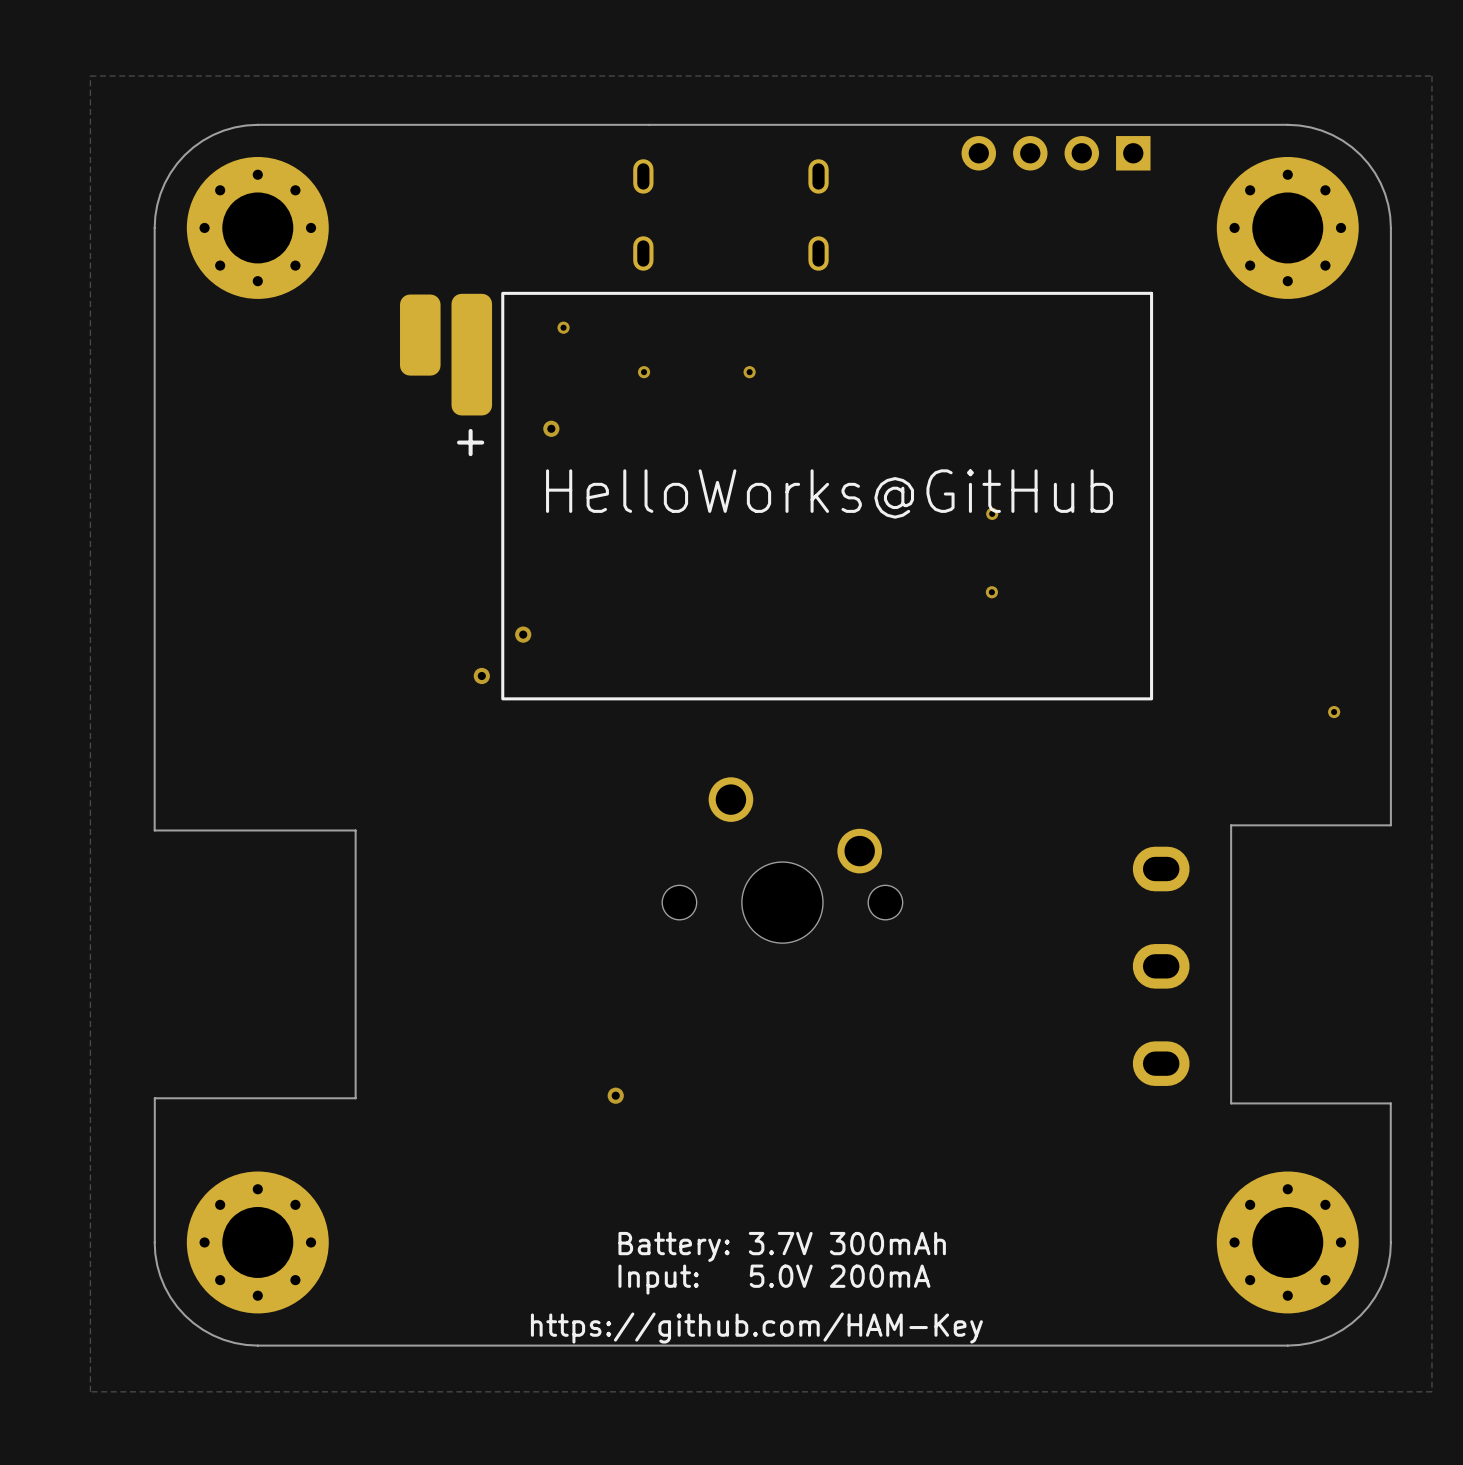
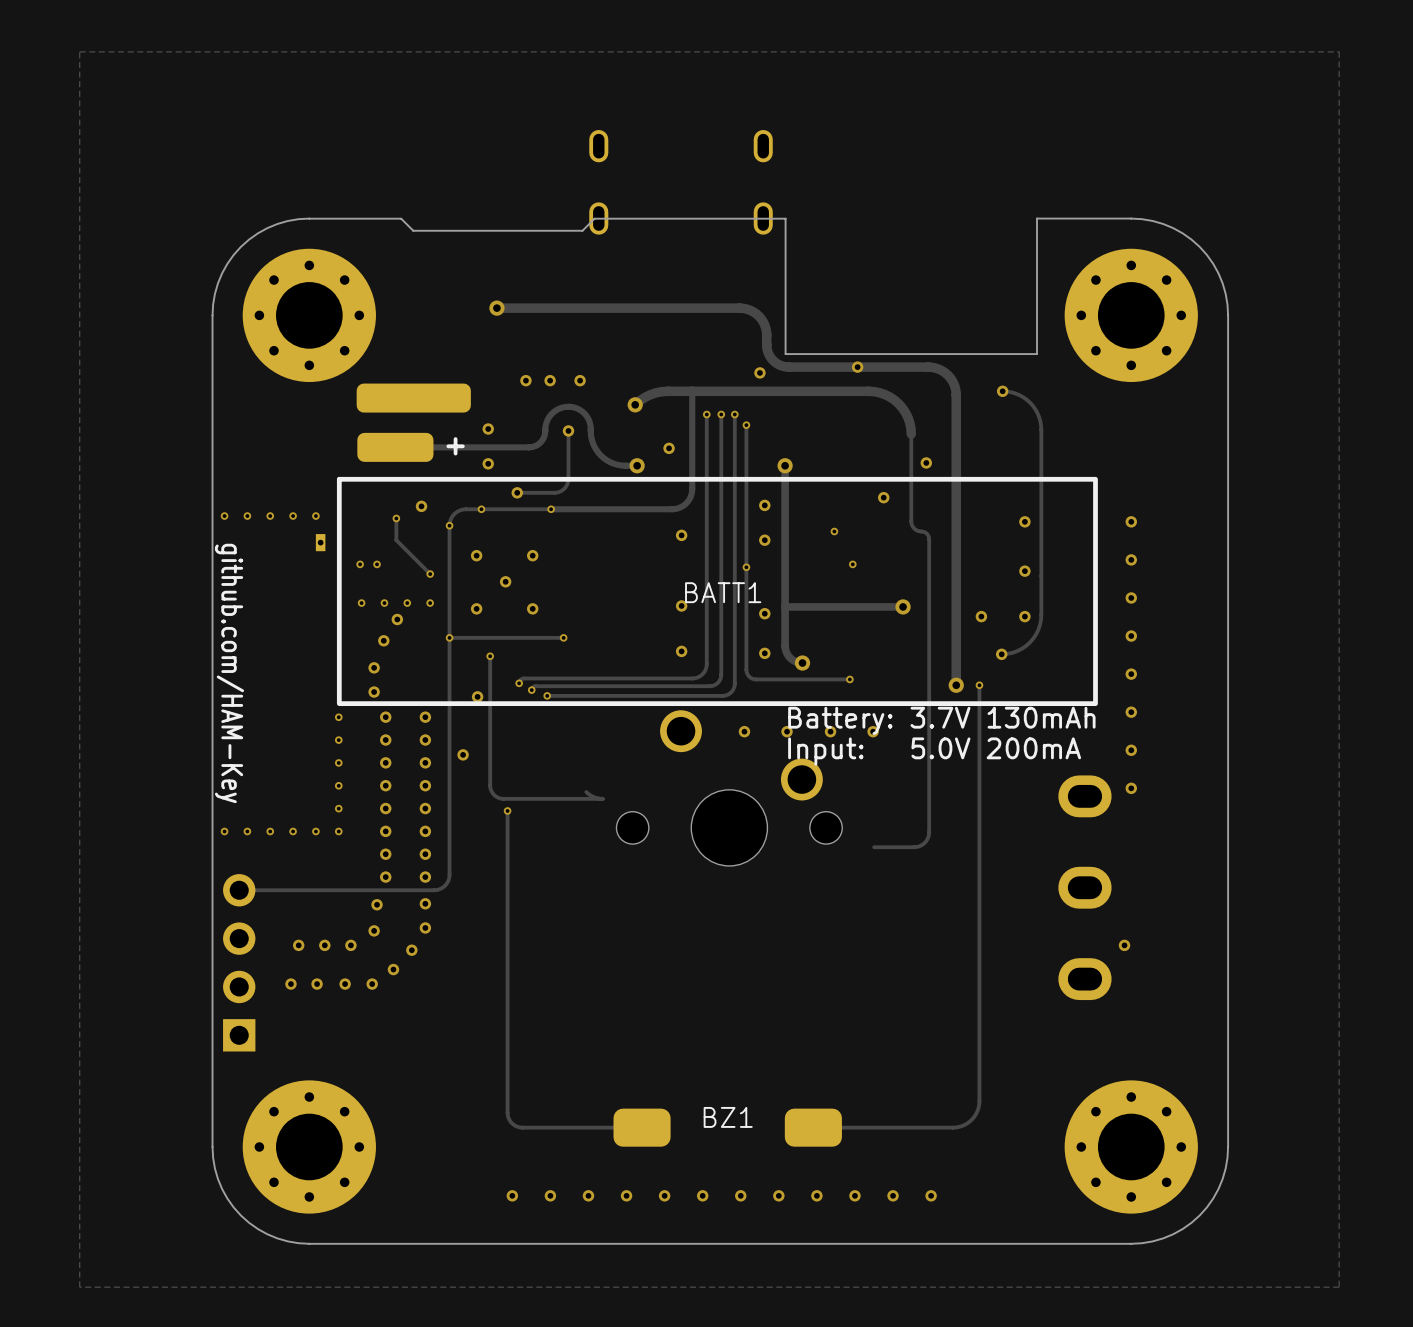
part: (1056, 153) -> none
part position: (257, 227) -> (309, 315)
part position: (1287, 227) -> (1131, 315)
via: (563, 327) -> none
track: none -> (496, 308) (742, 308) (754, 312) (762, 320) (766, 329) (768, 354) (773, 360) (781, 365) (928, 367) (937, 368) (945, 373) (953, 382) (956, 395) (956, 685)
via: none -> (496, 308)
via: (644, 372) -> none
via: (749, 372) -> none
via: none -> (857, 367)
via: none -> (759, 372)
via: none -> (525, 380)
via: none -> (550, 380)
via: none -> (580, 380)
via: (551, 428) -> none
track: none -> (692, 391) (692, 491) (690, 497) (684, 504) (671, 509) (551, 509)
track: none -> (1002, 391) (1015, 393) (1026, 399) (1035, 409) (1040, 421) (1041, 614) (1038, 629) (1029, 642) (1016, 651) (1001, 654)
via: none -> (1002, 391)
track: none -> (635, 404) (650, 394) (667, 391) (868, 391) (889, 397) (905, 412) (911, 434) (911, 523) (916, 529) (926, 533) (929, 539) (929, 834) (924, 842) (918, 846) (874, 847)
via: none -> (635, 404)
track: none -> (706, 414) (706, 664) (703, 672) (692, 678) (524, 678) (519, 683)
via: none -> (706, 414)
track: none -> (721, 414) (721, 674) (718, 681) (709, 686) (535, 686) (531, 690)
via: none -> (721, 414)
track: none -> (734, 414) (734, 683) (733, 689) (728, 694) (722, 695) (547, 695)
via: none -> (734, 414)
track: none -> (746, 425) (747, 673) (750, 677) (756, 679) (849, 679)
via: none -> (746, 425)
via: none -> (488, 429)
track: none -> (568, 430) (568, 478) (565, 487) (555, 492) (517, 492)
via: none -> (568, 430)
text: HelloWorks@GitHub (829, 494) -> none
part: (776, 496) -> none
track: none -> (395, 447) (533, 446) (543, 439) (546, 422) (552, 413) (560, 408) (570, 406) (580, 410) (587, 417) (592, 442) (603, 458) (617, 464) (637, 465)
via: none -> (669, 448)
via: none -> (488, 463)
via: none -> (637, 465)
track: none -> (785, 465) (785, 647) (791, 659) (802, 663)
via: none -> (785, 465)
via: none -> (517, 492)
via: none -> (883, 497)
via: none -> (764, 505)
via: none -> (421, 506)
via: none -> (481, 509)
track: none -> (551, 509) (463, 509) (455, 512) (450, 521) (449, 874) (446, 884) (440, 888) (434, 890) (239, 890)
via: none -> (551, 509)
via: none -> (224, 516)
via: none -> (247, 516)
via: none -> (270, 516)
via: none -> (293, 516)
via: none -> (315, 516)
track: none -> (396, 518) (396, 540) (430, 574)
via: none -> (396, 518)
via: none -> (1024, 521)
via: none -> (1131, 521)
via: none -> (449, 525)
via: none -> (834, 531)
via: none -> (681, 535)
via: (991, 592) -> none
via: none -> (764, 540)
part: none -> (320, 542)
BATT1: none -> (717, 544)
via: none -> (476, 555)
via: none -> (532, 555)
via: none -> (1131, 559)
via: none -> (360, 564)
via: none -> (377, 564)
via: none -> (852, 564)
via: none -> (746, 567)
via: none -> (1024, 571)
via: none -> (430, 574)
via: (523, 634) -> none
via: none -> (505, 581)
via: none -> (1131, 597)
via: none -> (361, 603)
via: none -> (384, 603)
via: none -> (407, 603)
via: none -> (430, 603)
via: none -> (681, 605)
track: none -> (903, 606) (785, 606)
via: none -> (903, 606)
via: none -> (476, 608)
via: none -> (532, 608)
via: none -> (764, 613)
via: (481, 675) -> none
via: none -> (981, 616)
via: none -> (1024, 616)
via: none -> (397, 619)
via: none -> (1131, 636)
via: none -> (449, 637)
track: none -> (563, 637) (449, 637)
via: none -> (563, 637)
via: none -> (383, 640)
via: (1334, 712) -> none
via: none -> (681, 651)
via: none -> (764, 653)
via: none -> (1001, 654)
track: none -> (490, 656) (490, 785) (492, 792) (502, 798) (602, 798) (593, 797) (586, 792)
via: none -> (490, 656)
via: none -> (802, 663)
via: none -> (374, 667)
text: none -> github.com/HAM-Key (229, 673)
via: none -> (1131, 674)
via: none -> (849, 679)
via: none -> (519, 683)
via: none -> (956, 685)
track: none -> (979, 685) (977, 1109) (969, 1121) (955, 1127) (813, 1127)
via: none -> (979, 685)
via: none -> (531, 690)
via: none -> (374, 692)
via: none -> (547, 695)
via: none -> (477, 696)
via: none -> (1131, 712)
via: none -> (338, 717)
via: none -> (385, 717)
via: none -> (425, 717)
text: none -> Battery: 3.7V 130mAh (941, 720)
via: none -> (744, 731)
via: none -> (787, 731)
via: none -> (830, 731)
via: none -> (873, 731)
via: none -> (385, 740)
via: none -> (425, 740)
via: none -> (338, 740)
via: none -> (1131, 750)
text: none -> Input: 5.0V 200mA (934, 751)
via: none -> (463, 754)
board edge: (1390, 825) (1390, 216) (1385, 193) (1375, 173) (1360, 155) (1342, 140) (1321, 130) (1287, 124) (257, 124) (234, 127) (213, 135) (193, 147) (177, 163) (164, 183) (155, 216) (154, 830) (355, 830) (355, 1098) (154, 1098) (155, 1254) (164, 1287) (177, 1306) (193, 1323) (213, 1335) (246, 1344) (335, 1345) -> (309, 218) (287, 220) (267, 228) (240, 246) (227, 263) (217, 283) (212, 315) (213, 1157) (222, 1189) (240, 1215) (267, 1234) (287, 1241) (309, 1243)
board edge: (1390, 825) (1231, 825) (1231, 1103) (1390, 1103) (1390, 1242) -> none
via: none -> (338, 762)
via: none -> (385, 762)
via: none -> (425, 762)
via: none -> (338, 785)
via: none -> (385, 785)
via: none -> (425, 785)
via: none -> (1131, 788)
via: none -> (385, 808)
via: none -> (425, 808)
via: none -> (338, 808)
track: none -> (507, 810) (509, 1119) (514, 1125) (520, 1127) (642, 1127)
via: none -> (507, 810)
via: none -> (224, 831)
via: none -> (247, 831)
via: none -> (270, 831)
via: none -> (293, 831)
via: none -> (315, 831)
via: none -> (338, 831)
via: none -> (385, 831)
via: none -> (425, 831)
via: none -> (385, 854)
via: none -> (425, 854)
via: none -> (385, 877)
via: none -> (425, 877)
via: none -> (425, 903)
via: none -> (377, 904)
via: none -> (425, 927)
via: none -> (374, 930)
via: none -> (298, 945)
via: none -> (324, 945)
via: none -> (350, 945)
via: none -> (1124, 945)
via: none -> (411, 950)
part: none -> (239, 962)
via: none -> (393, 969)
via: none -> (290, 984)
via: none -> (317, 984)
via: none -> (345, 984)
via: none -> (372, 984)
via: (615, 1095) -> none
BZ1: none -> (727, 1127)
part position: (257, 1242) -> (309, 1146)
part position: (1287, 1242) -> (1131, 1146)
board edge: (1390, 1242) (1385, 1276) (1375, 1297) (1360, 1315) (1342, 1329) (1321, 1339) (1299, 1344) (1210, 1345) -> (309, 218) (401, 218) (413, 230) (582, 230) (594, 218) (785, 218) (785, 354) (1036, 354) (1036, 218) (1131, 218) (1152, 220) (1182, 233) (1206, 255) (1222, 283) (1228, 315) (1227, 1157) (1218, 1189) (1199, 1215) (1173, 1234) (1152, 1241) (1131, 1243)
text: Battery: 3.7V 300mAh (782, 1246) -> none
text: Input: 5.0V 200mA (774, 1279) -> none
via: none -> (512, 1195)
via: none -> (550, 1195)
via: none -> (588, 1195)
via: none -> (626, 1195)
via: none -> (664, 1195)
via: none -> (702, 1195)
via: none -> (740, 1195)
via: none -> (778, 1195)
via: none -> (816, 1195)
via: none -> (854, 1195)
via: none -> (893, 1195)
via: none -> (931, 1195)
text: https://github.com/HAM-Key (756, 1328) -> none

